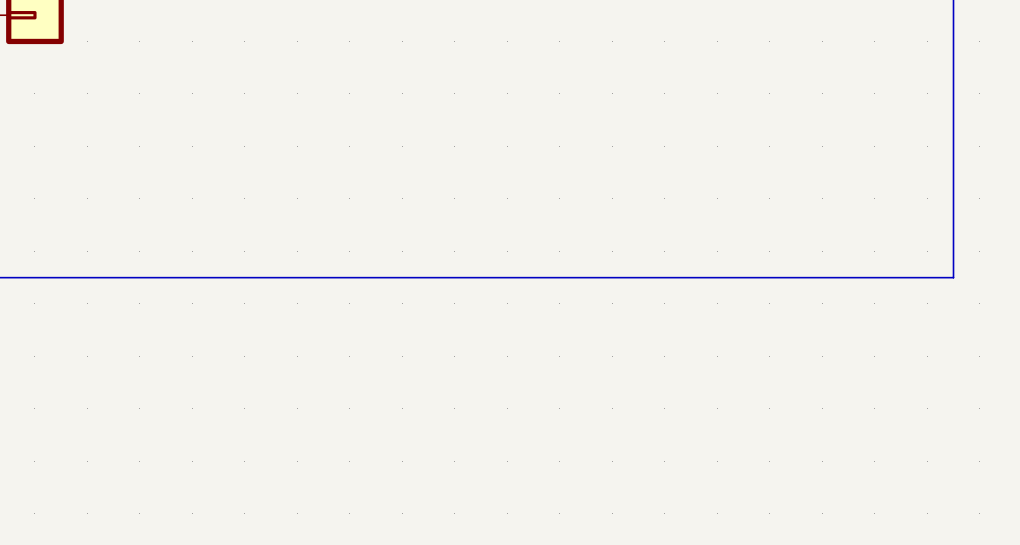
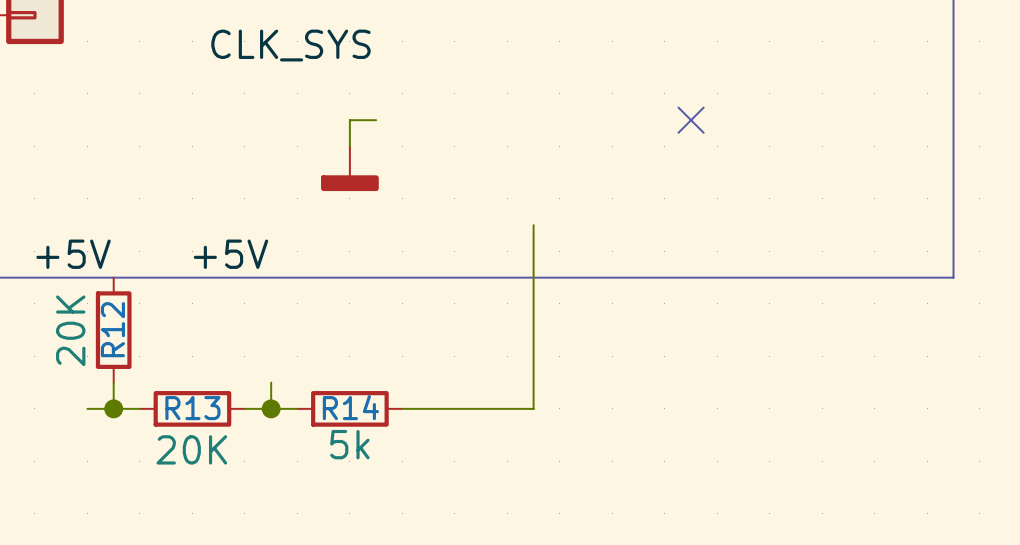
label: none -> CLK_SYS (290, 45)
wire: none -> (376, 120) (349, 120) (349, 146)
no-connect mark: none -> (691, 120)
power symbol: none -> (349, 168)
wire: none -> (533, 225) (533, 408) (402, 408)
label: none -> +5V (73, 254)
label: none -> +5V (230, 254)
R12: none -> 20K (113, 330)
wire: none -> (113, 382) (113, 408)
wire: none -> (271, 382) (271, 408)
wire: none -> (87, 408) (139, 408)
junction: none -> (113, 408)
R13: none -> 20K (192, 408)
wire: none -> (244, 408) (297, 408)
junction: none -> (271, 408)
R14: none -> 5k (349, 408)

